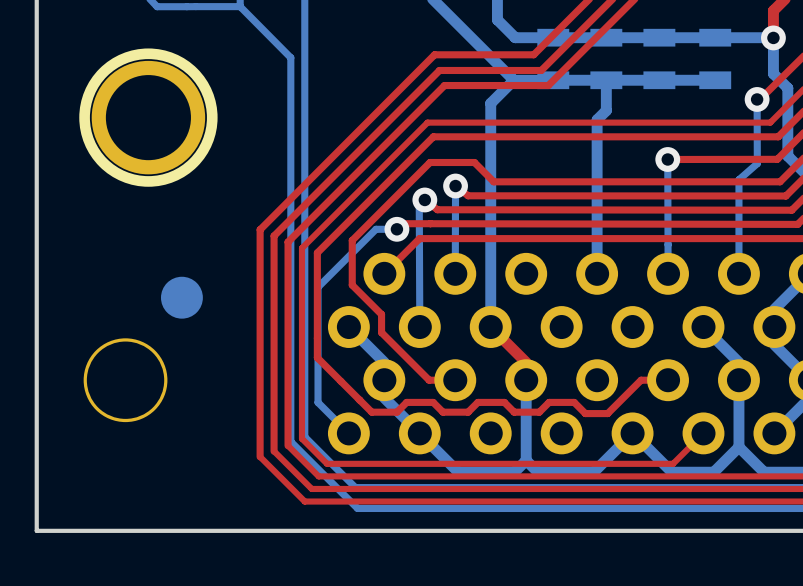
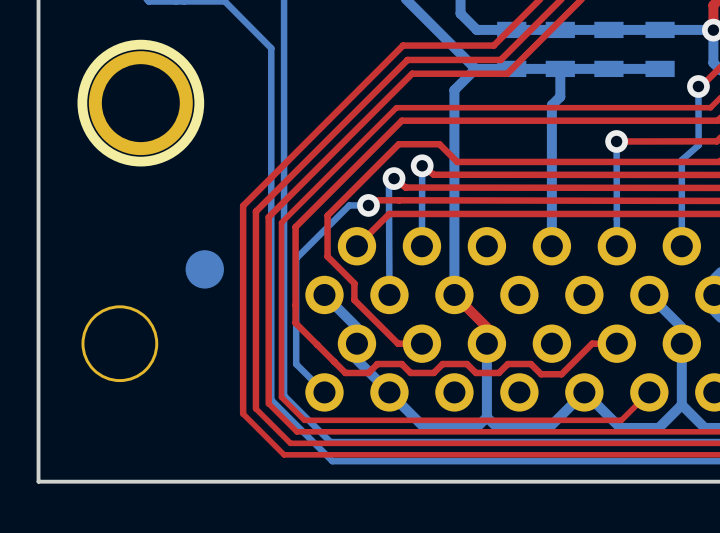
part position: (181, 297) -> (204, 269)

